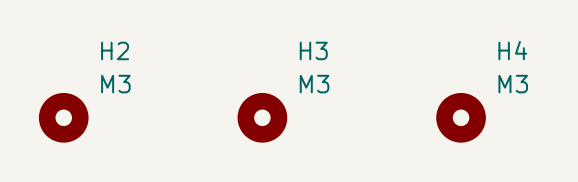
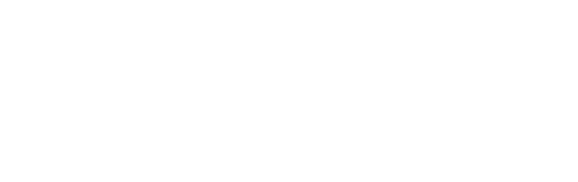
H2: M3 (63, 117) -> none
H3: M3 (262, 117) -> none
H4: M3 (461, 117) -> none

